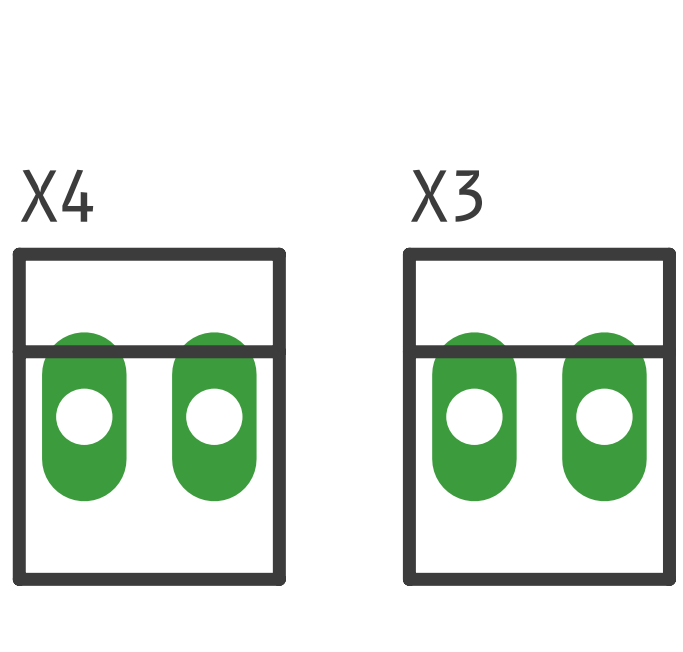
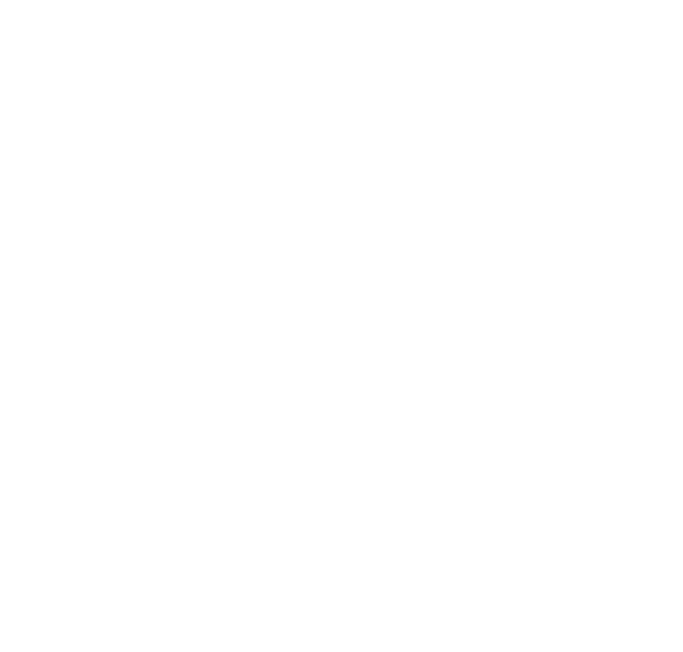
X4: (149, 416) -> none
X3: (539, 416) -> none

